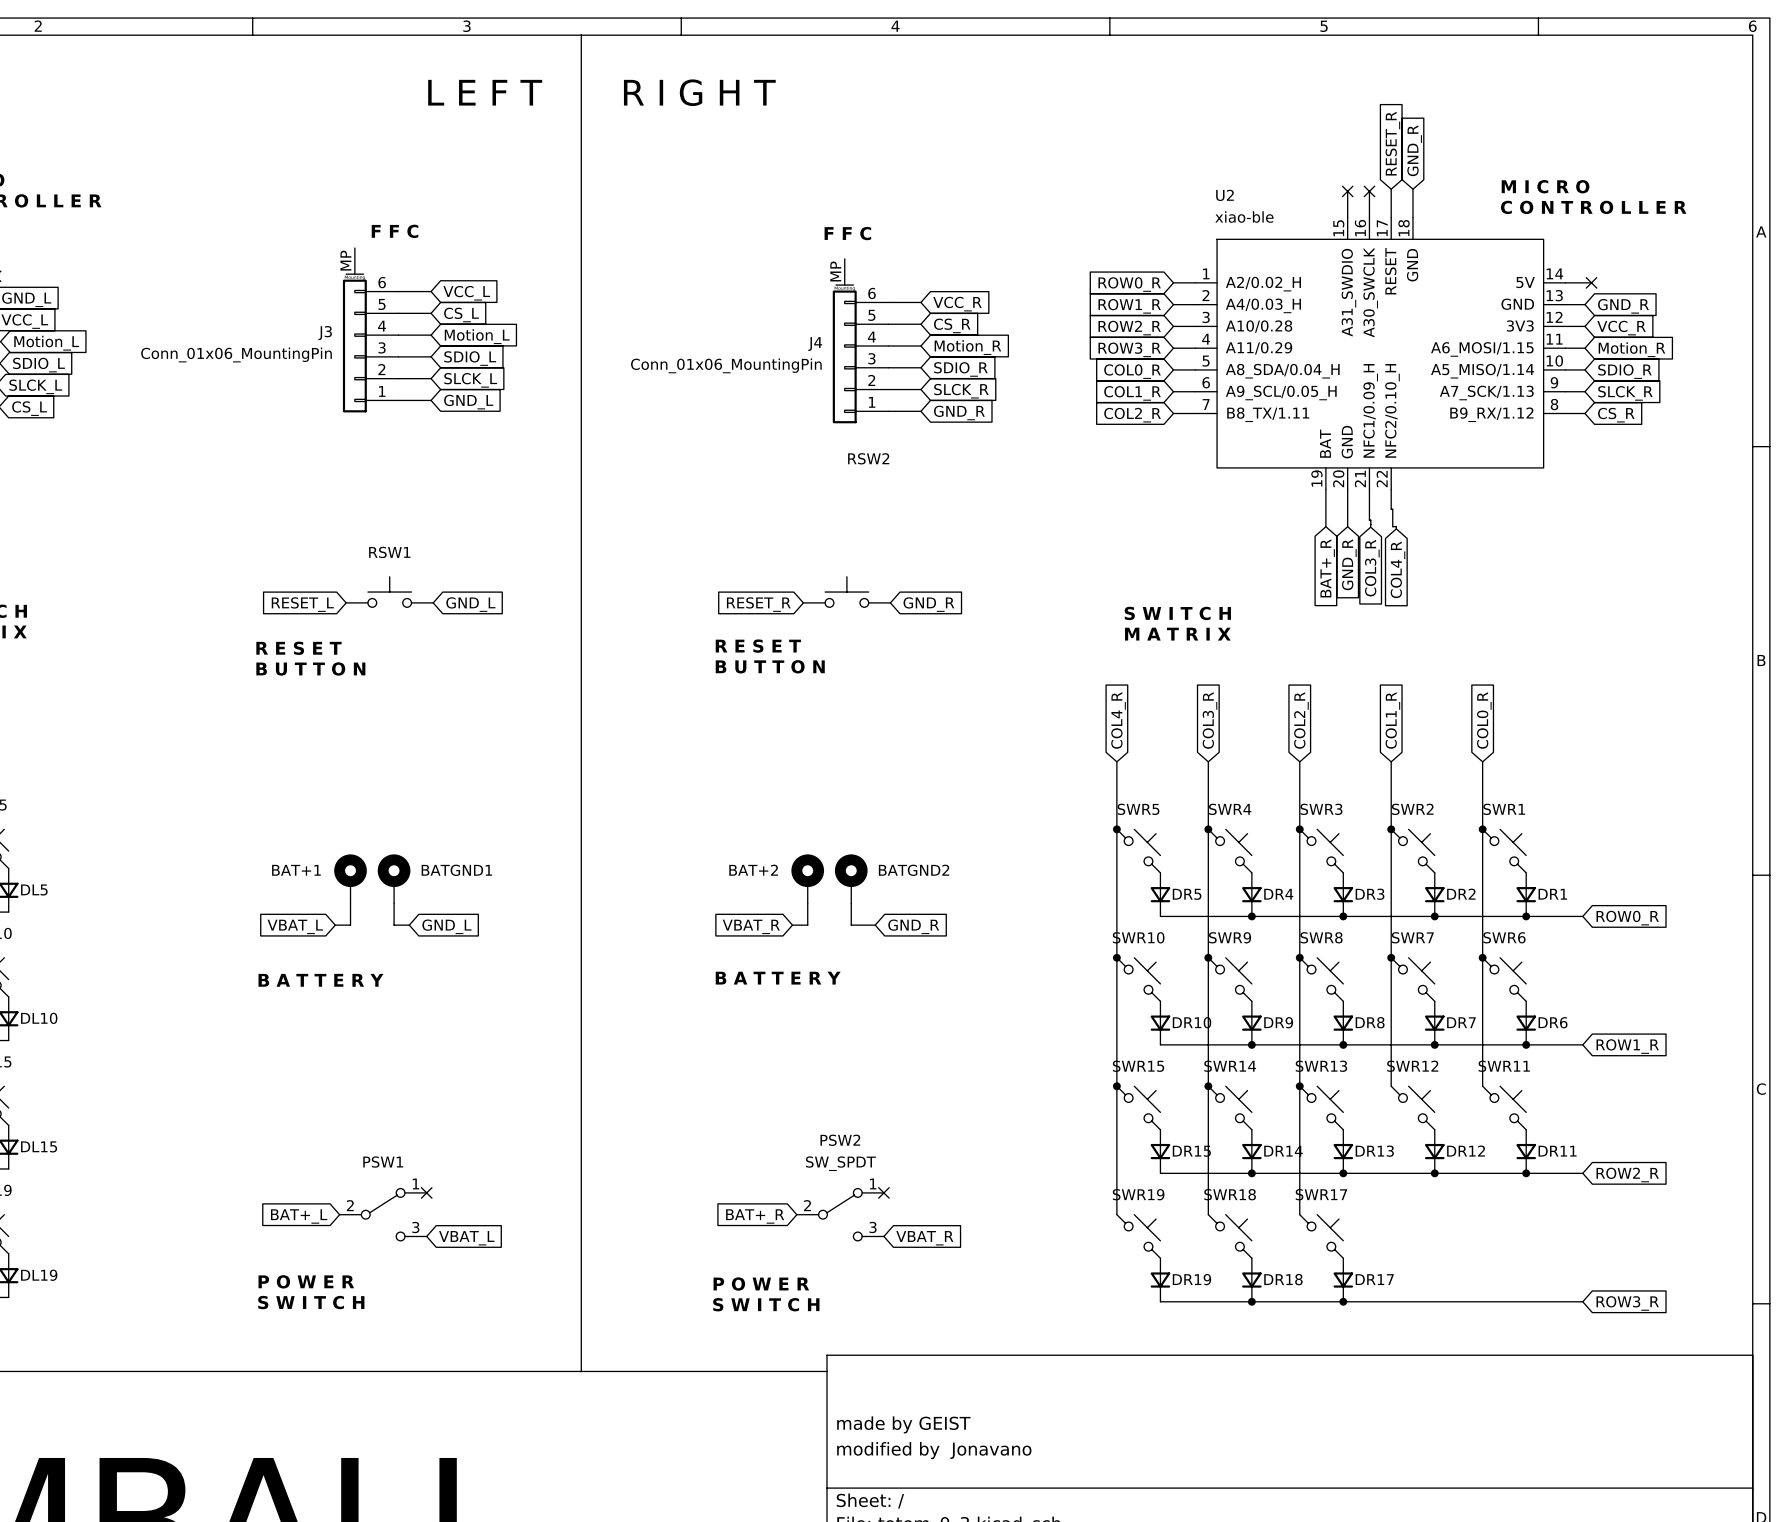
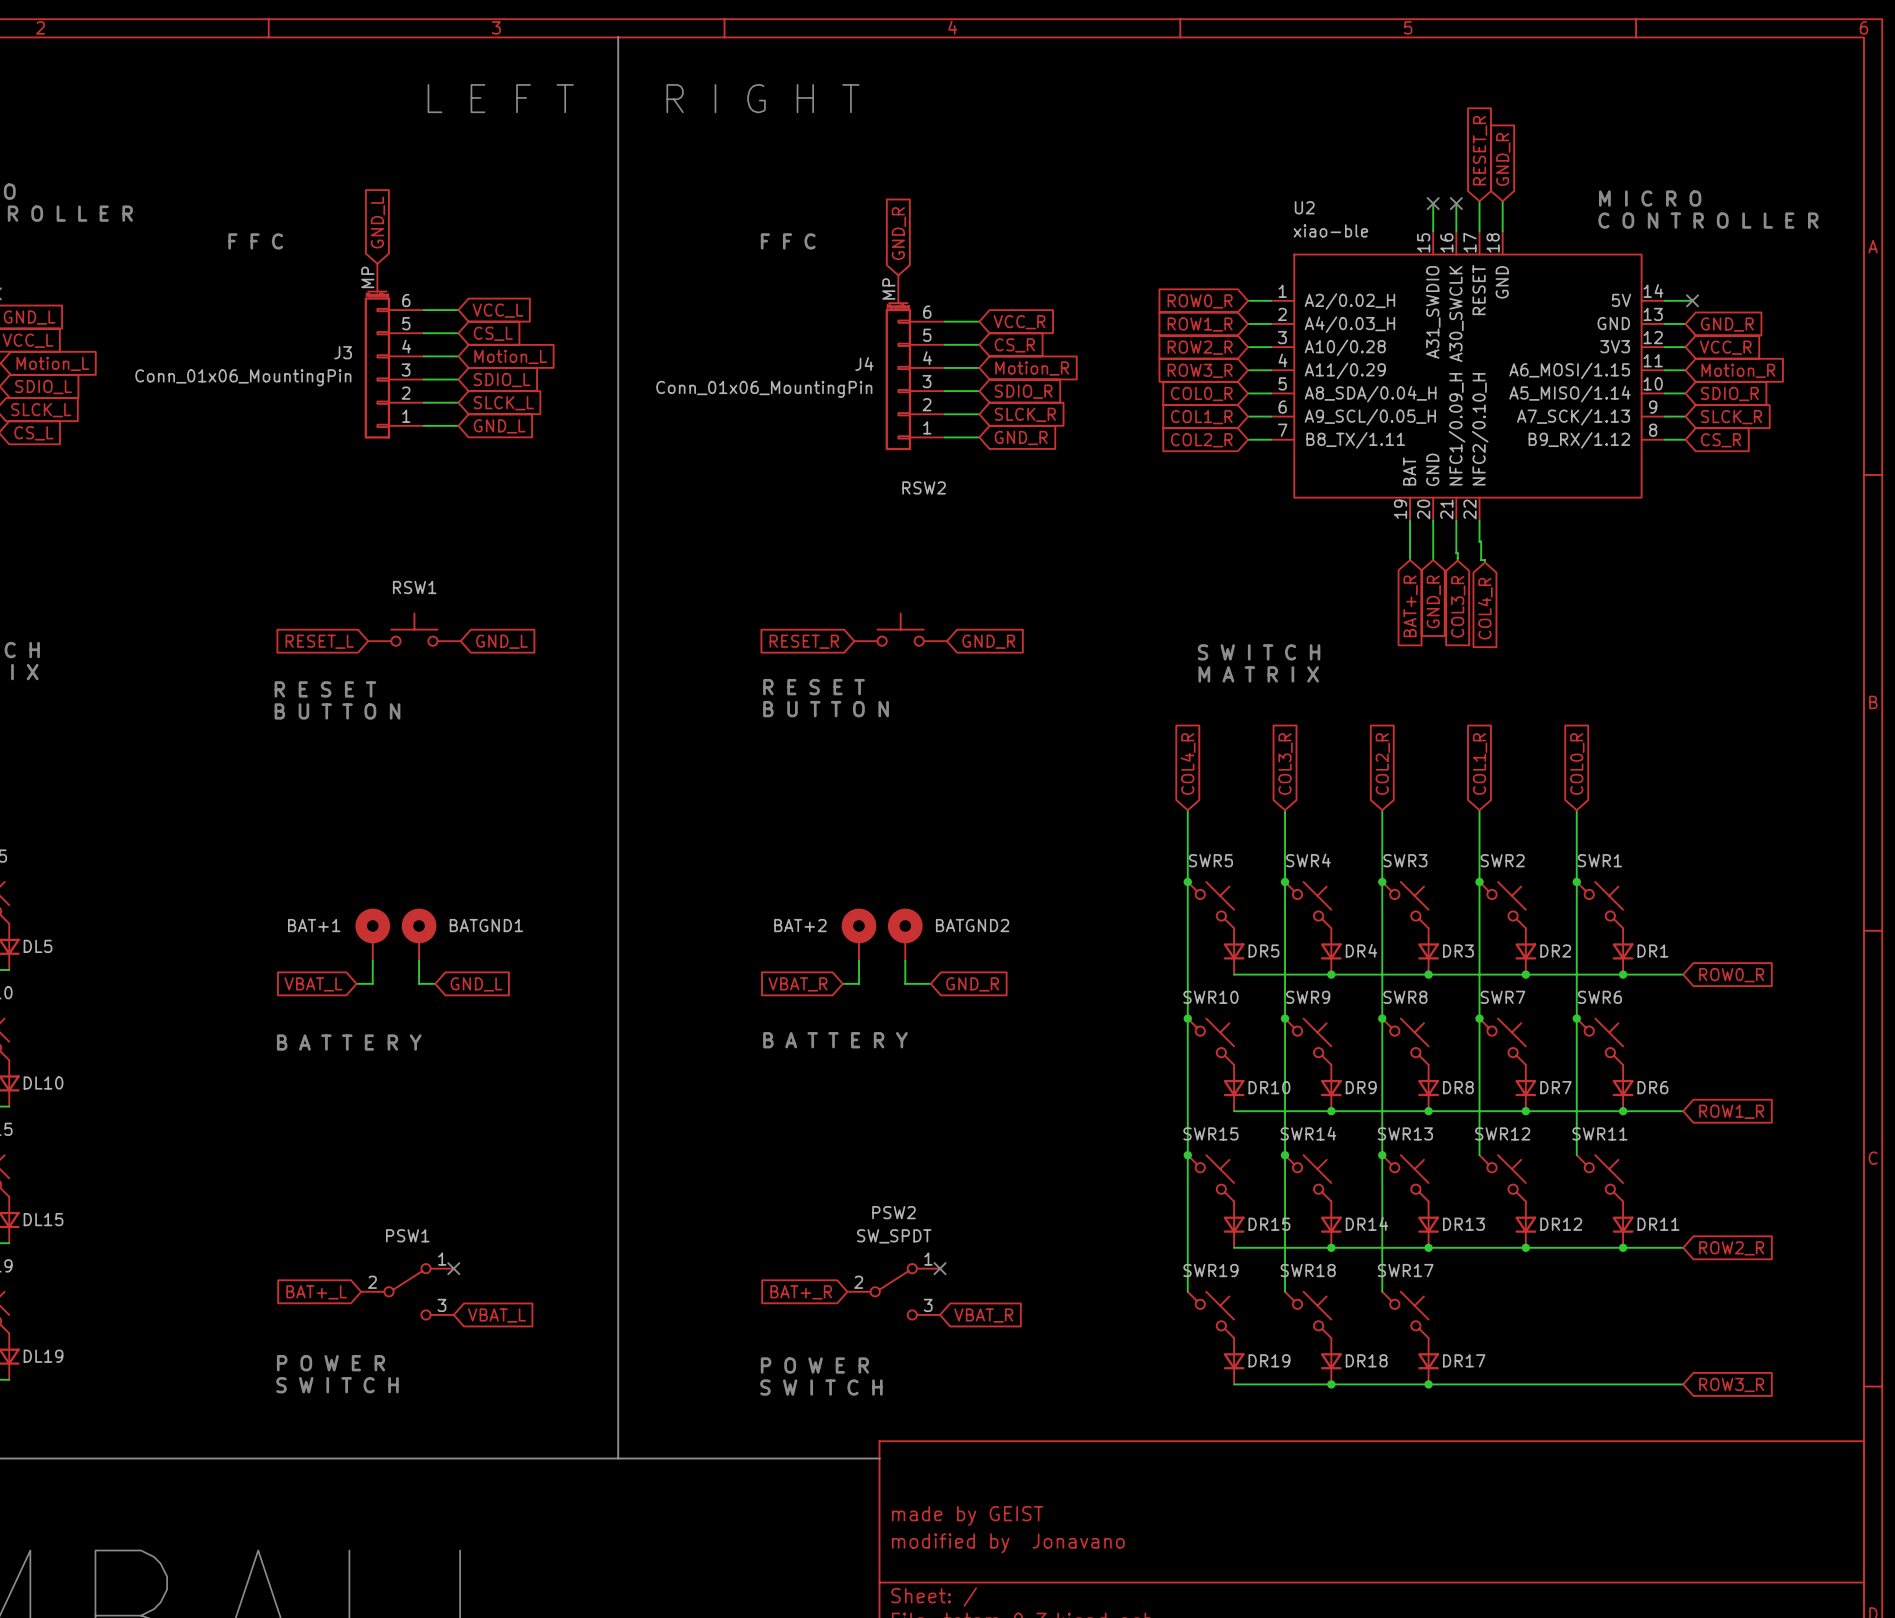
global label: none -> GND_L (377, 222)
global label: none -> GND_R (898, 233)
text position: F F C (395, 231) -> F F C (255, 241)
text position: F F C (847, 233) -> F F C (788, 241)

